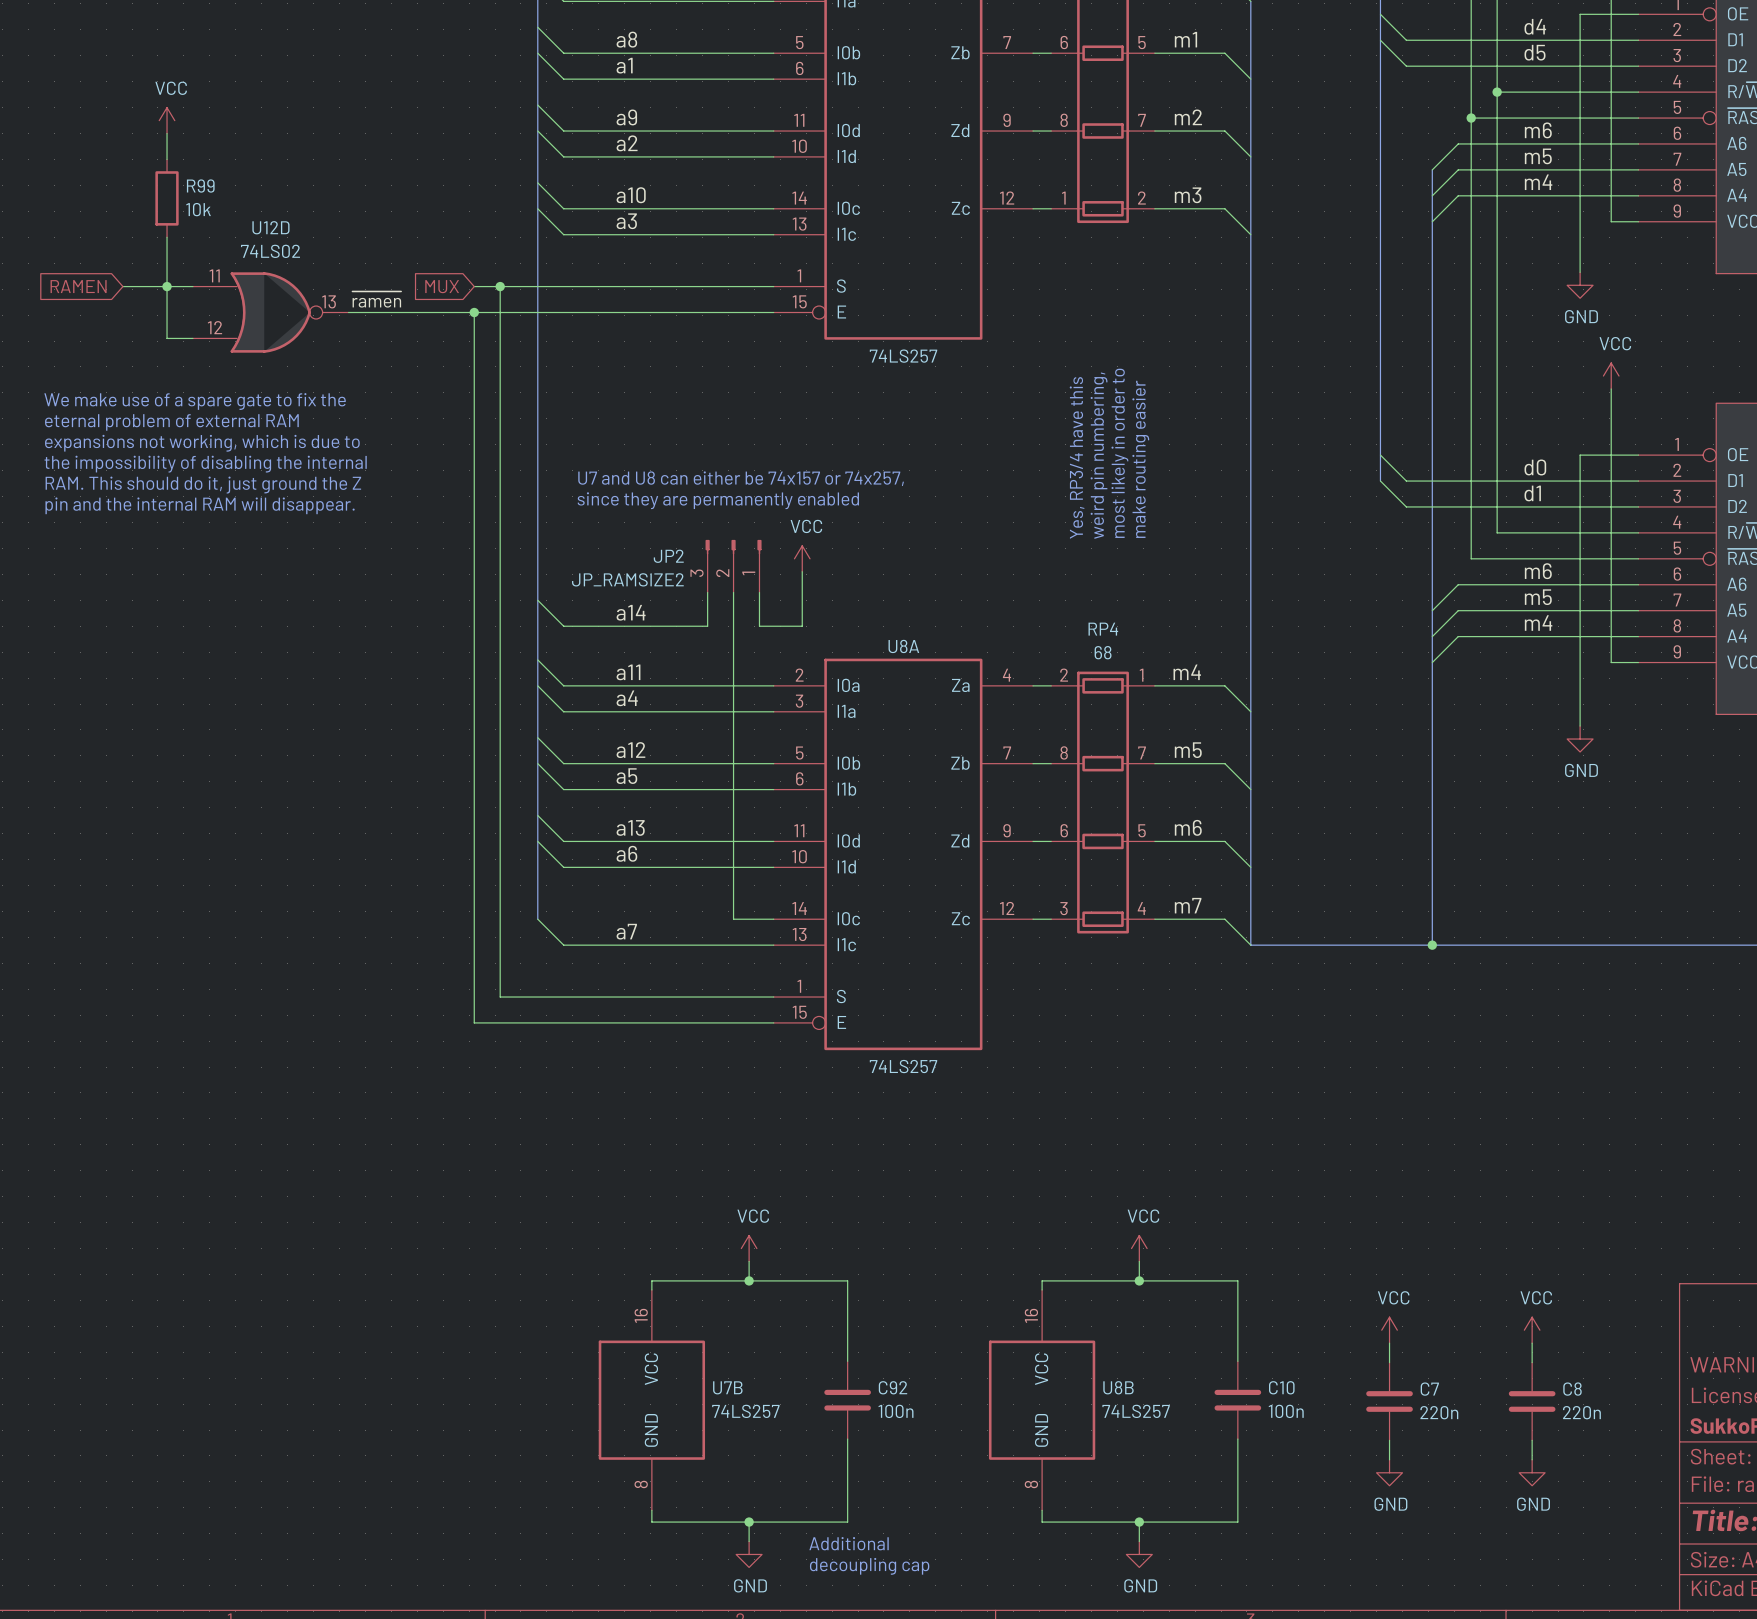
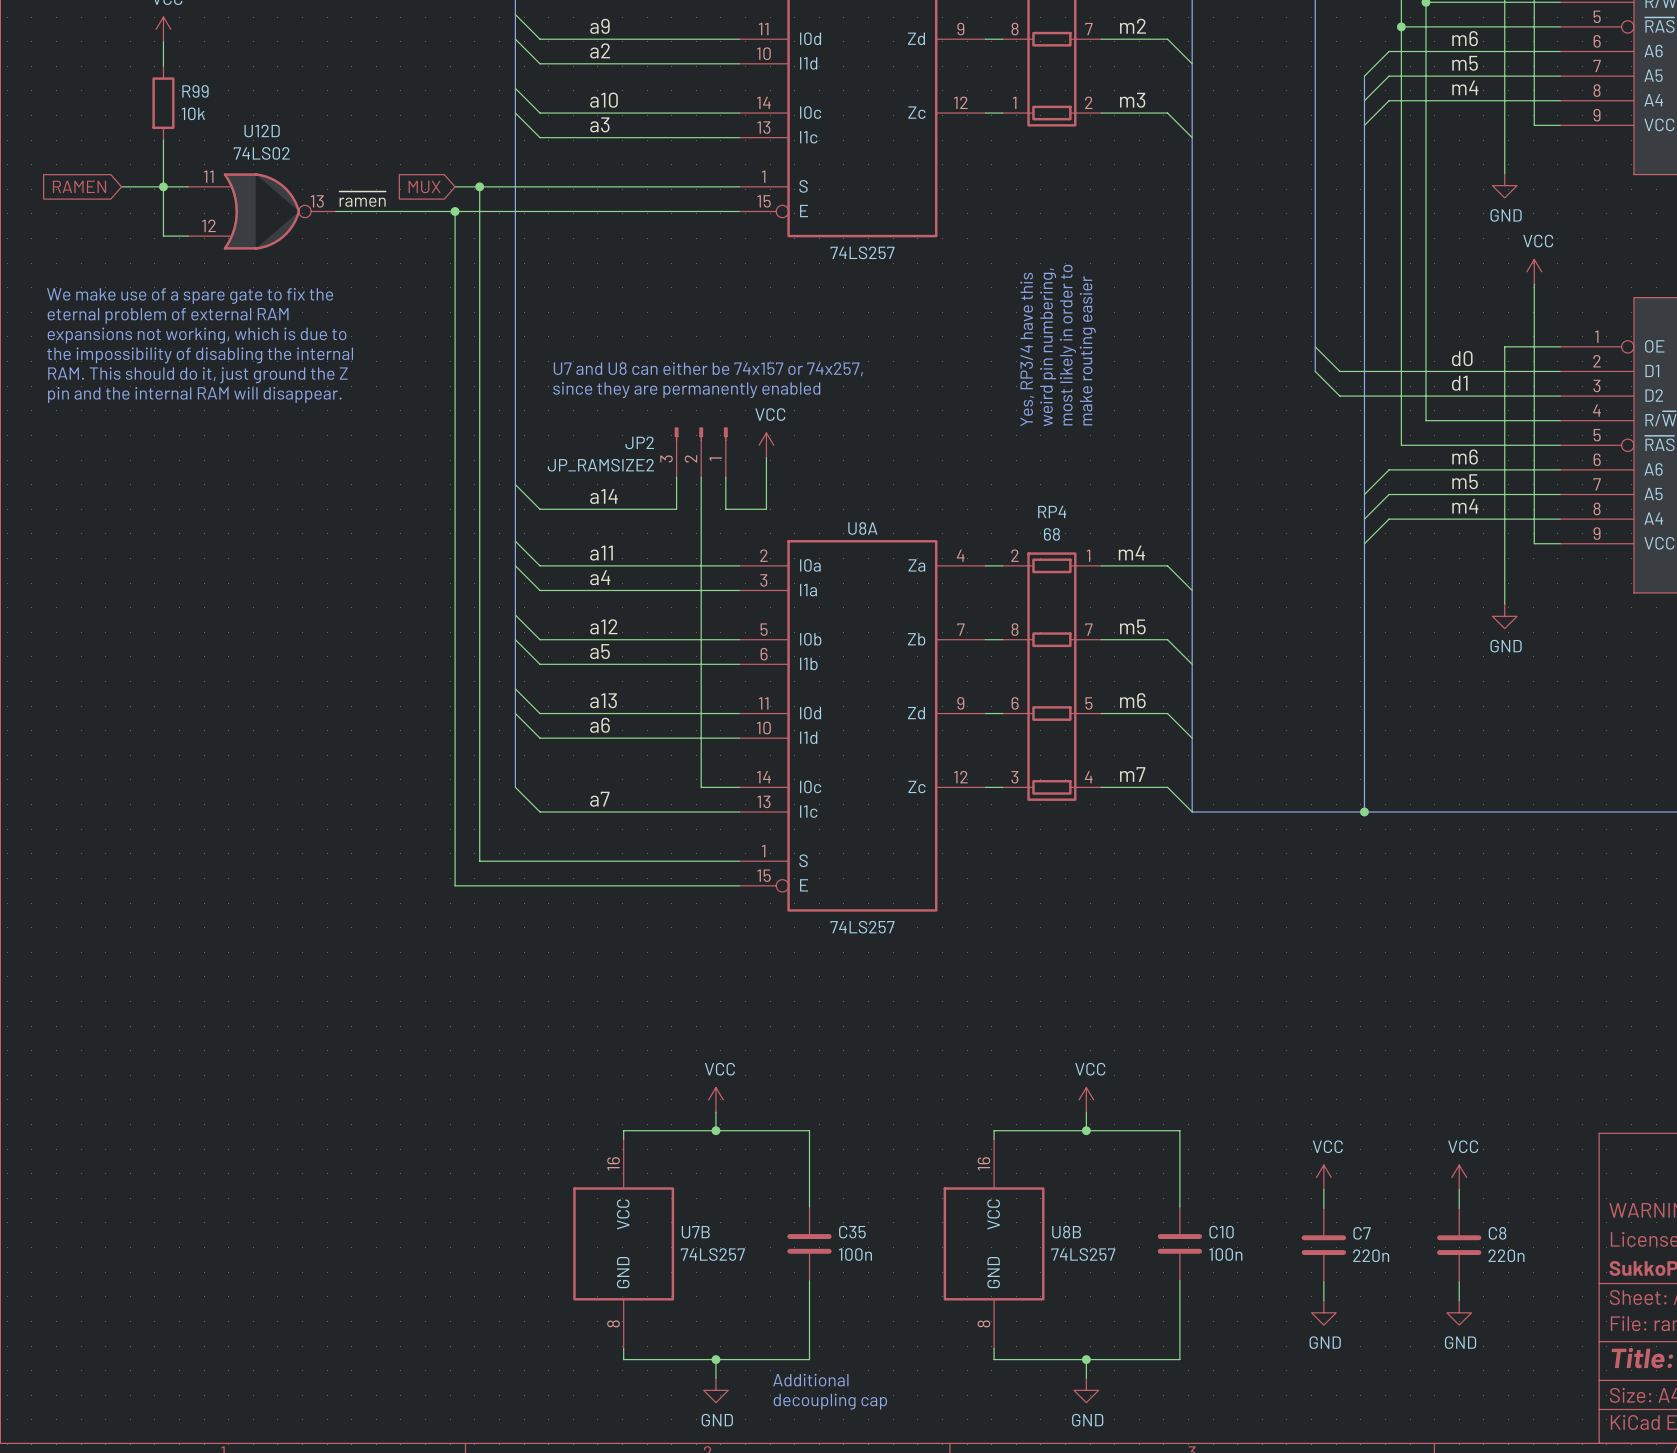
C92 name: C92 (892, 1387) -> C35 (852, 1232)

